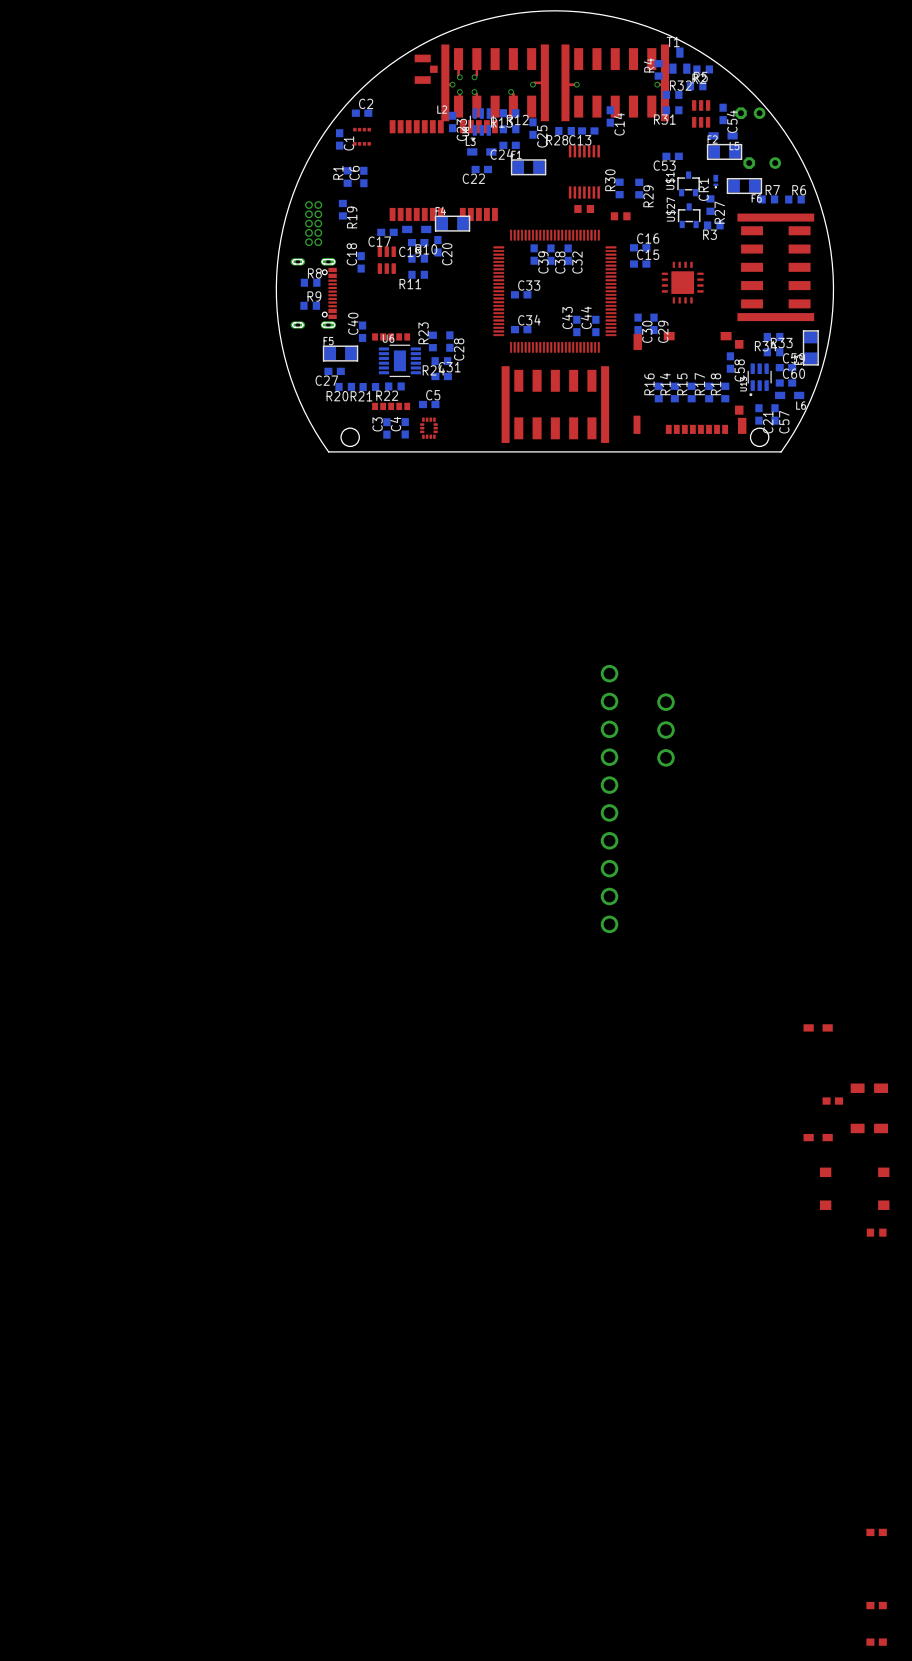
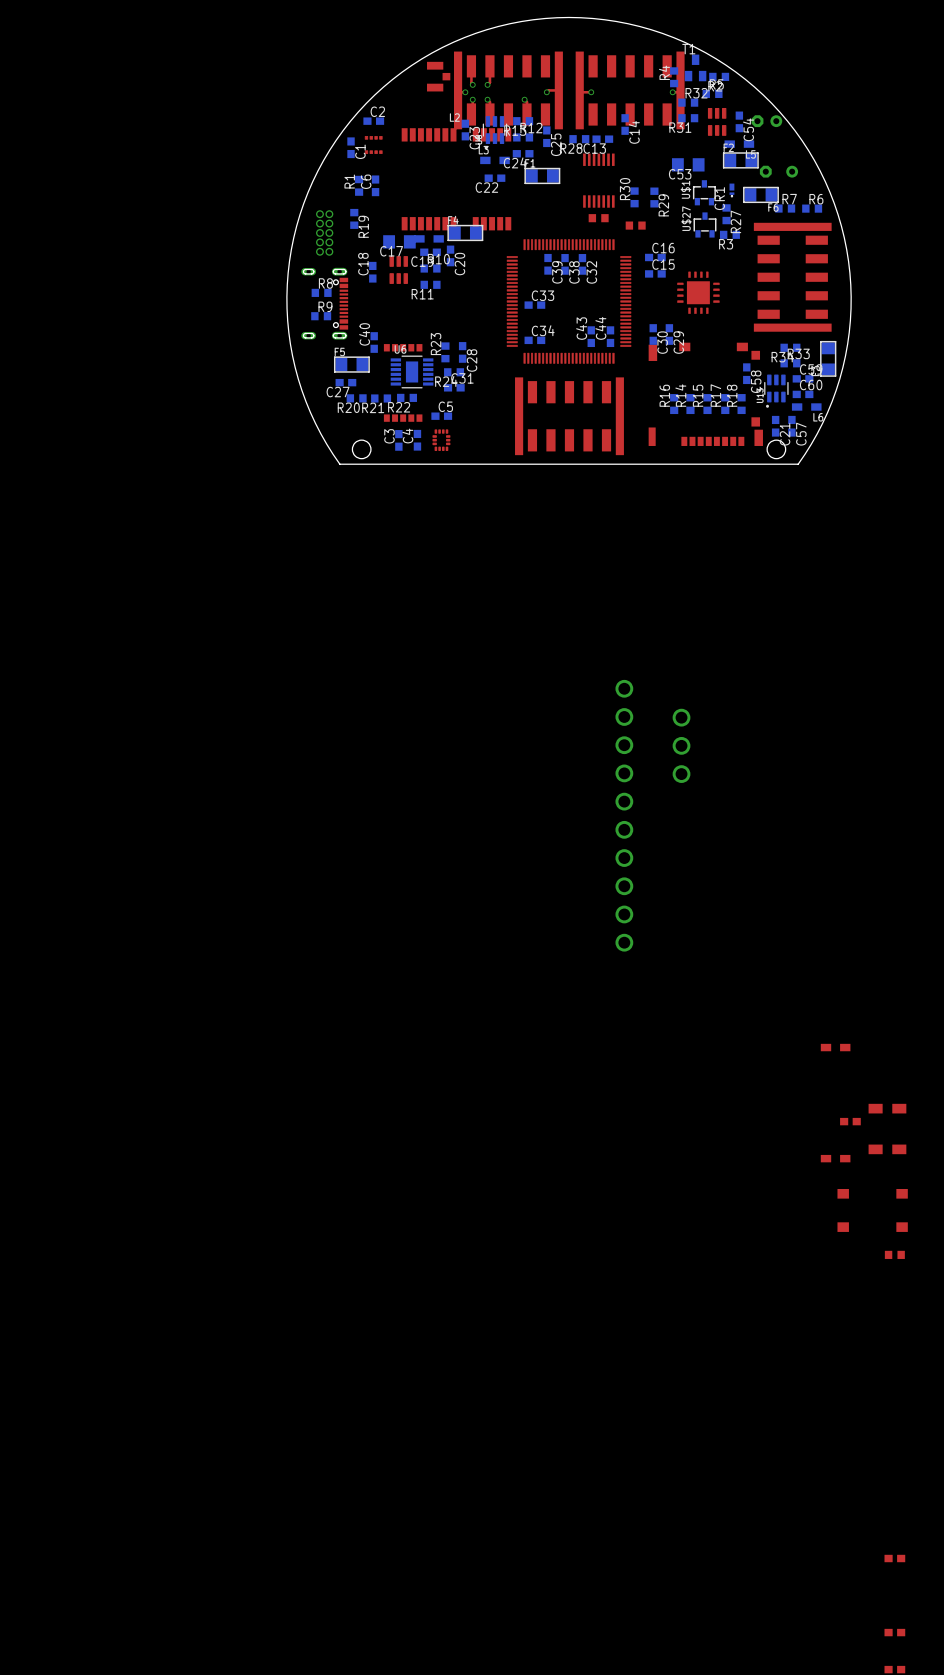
C53 footprint: [662, 152, 683, 160] -> [671, 158, 705, 172]
C17 footprint: [377, 228, 398, 237] -> [383, 235, 416, 249]

